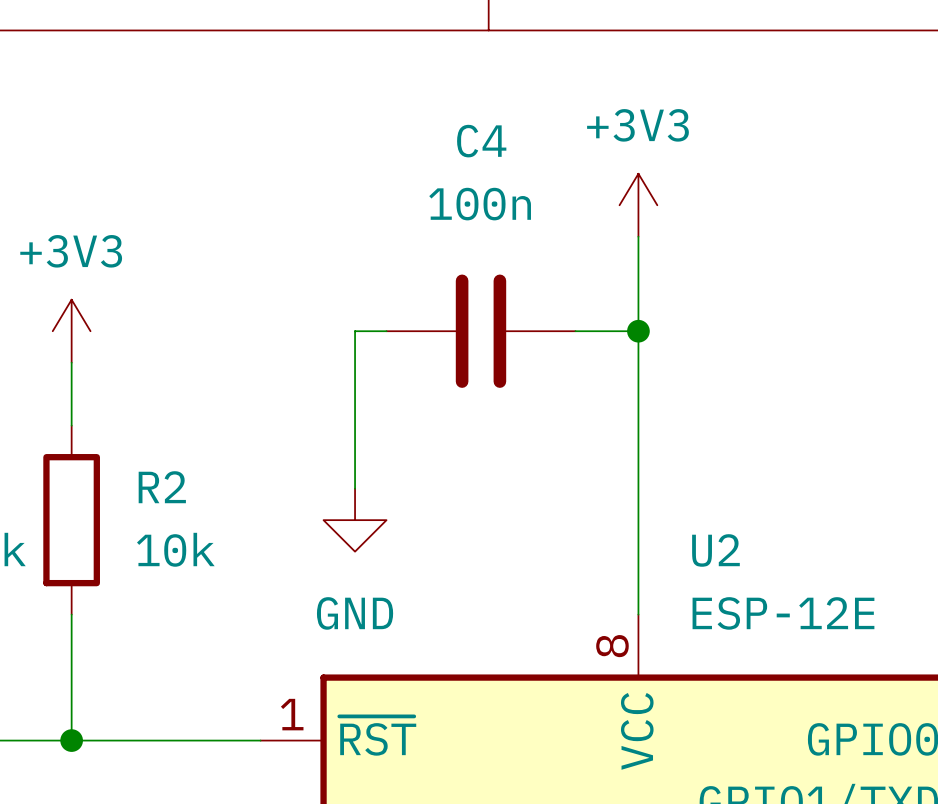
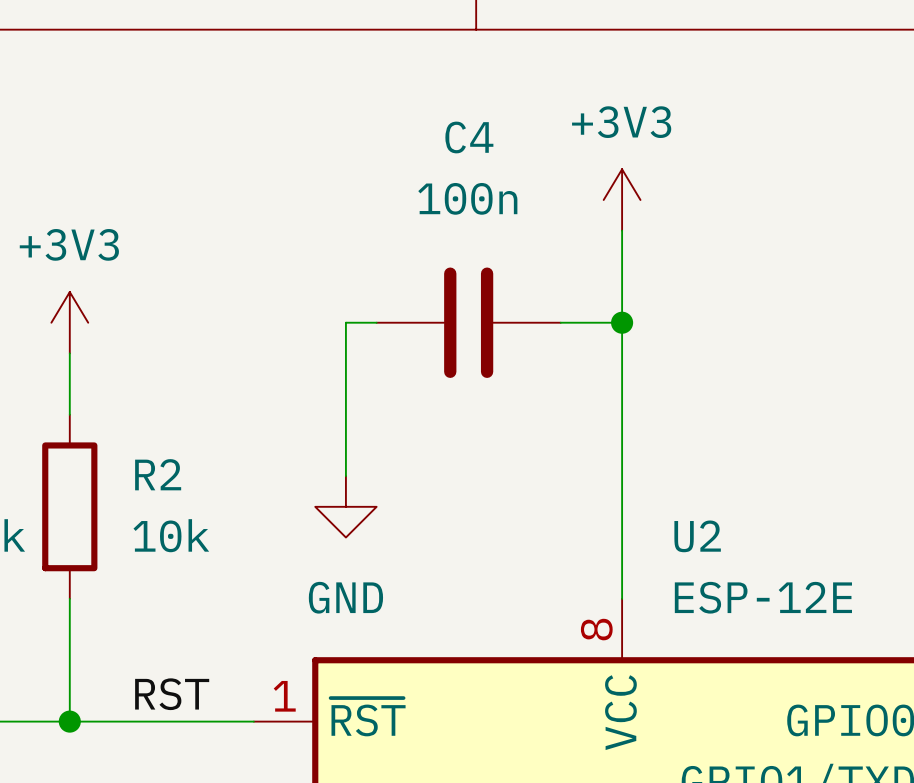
label: none -> RST (172, 694)

